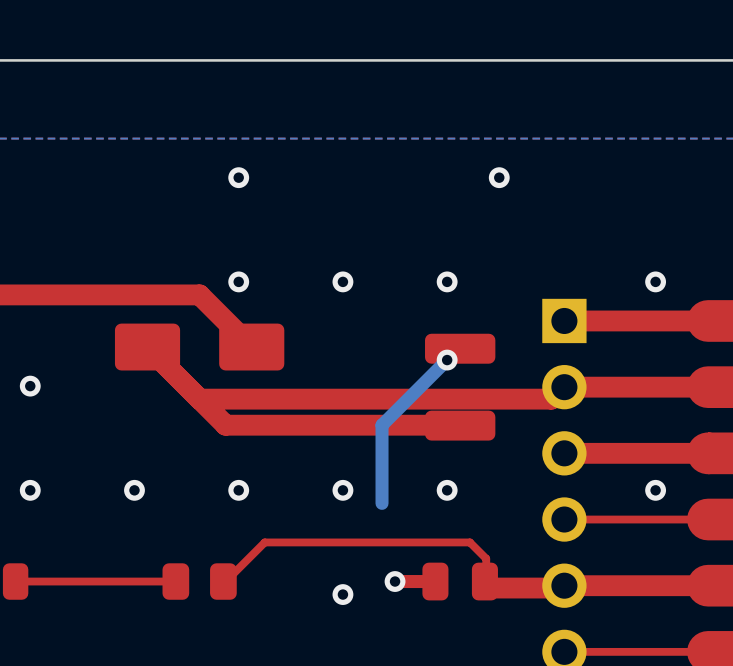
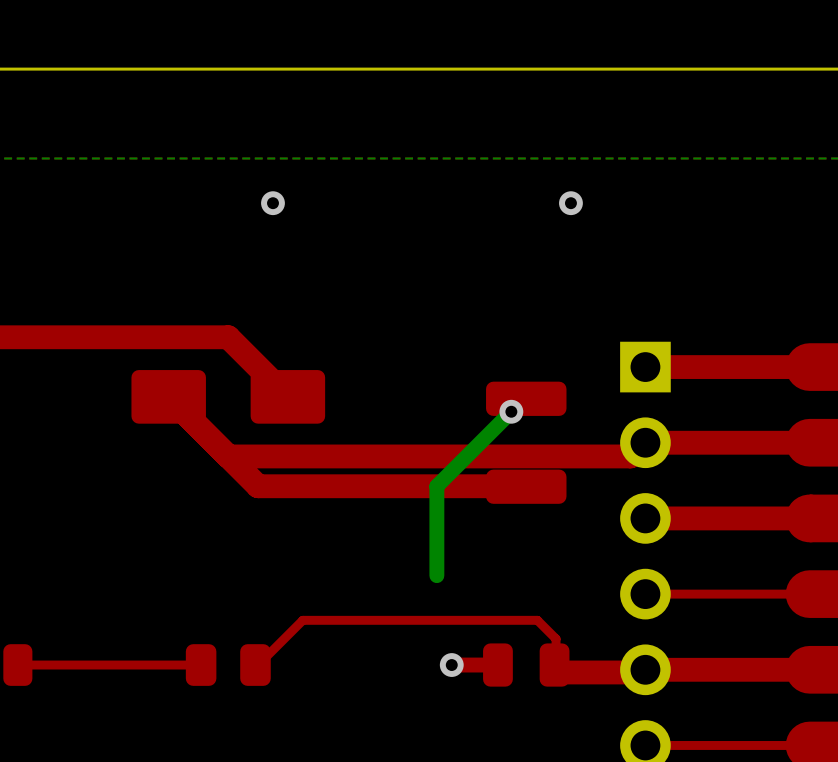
via: (238, 281) -> none
via: (342, 281) -> none
via: (447, 281) -> none
via: (655, 281) -> none
via: (30, 386) -> none
via: (30, 490) -> none
via: (134, 490) -> none
via: (238, 490) -> none
via: (342, 490) -> none
via: (447, 490) -> none
via: (655, 490) -> none
via: (342, 594) -> none

